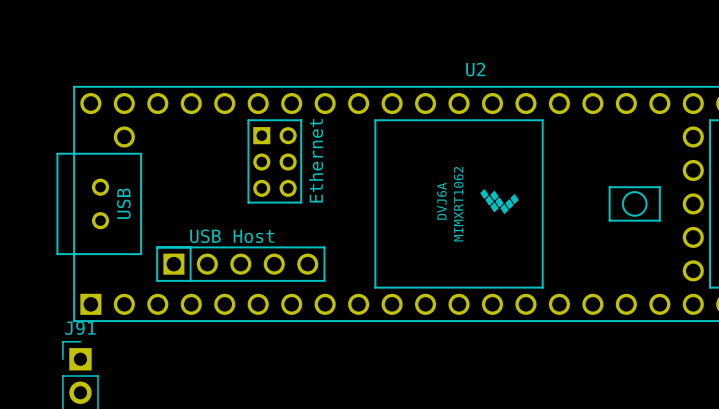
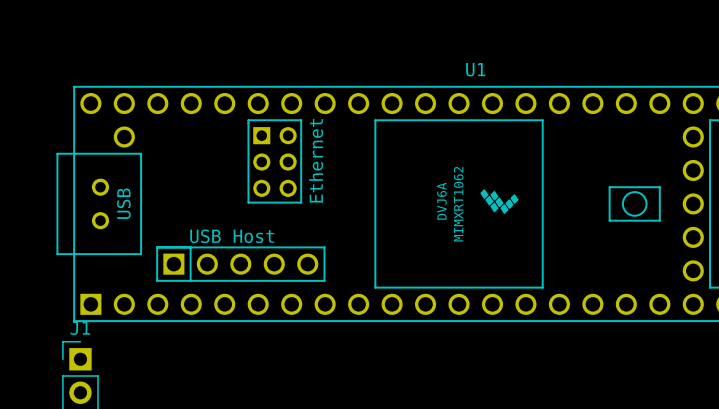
U2 name: U2 (475, 69) -> U1 (475, 69)
J91 name: J91 (80, 328) -> J1 (80, 328)

